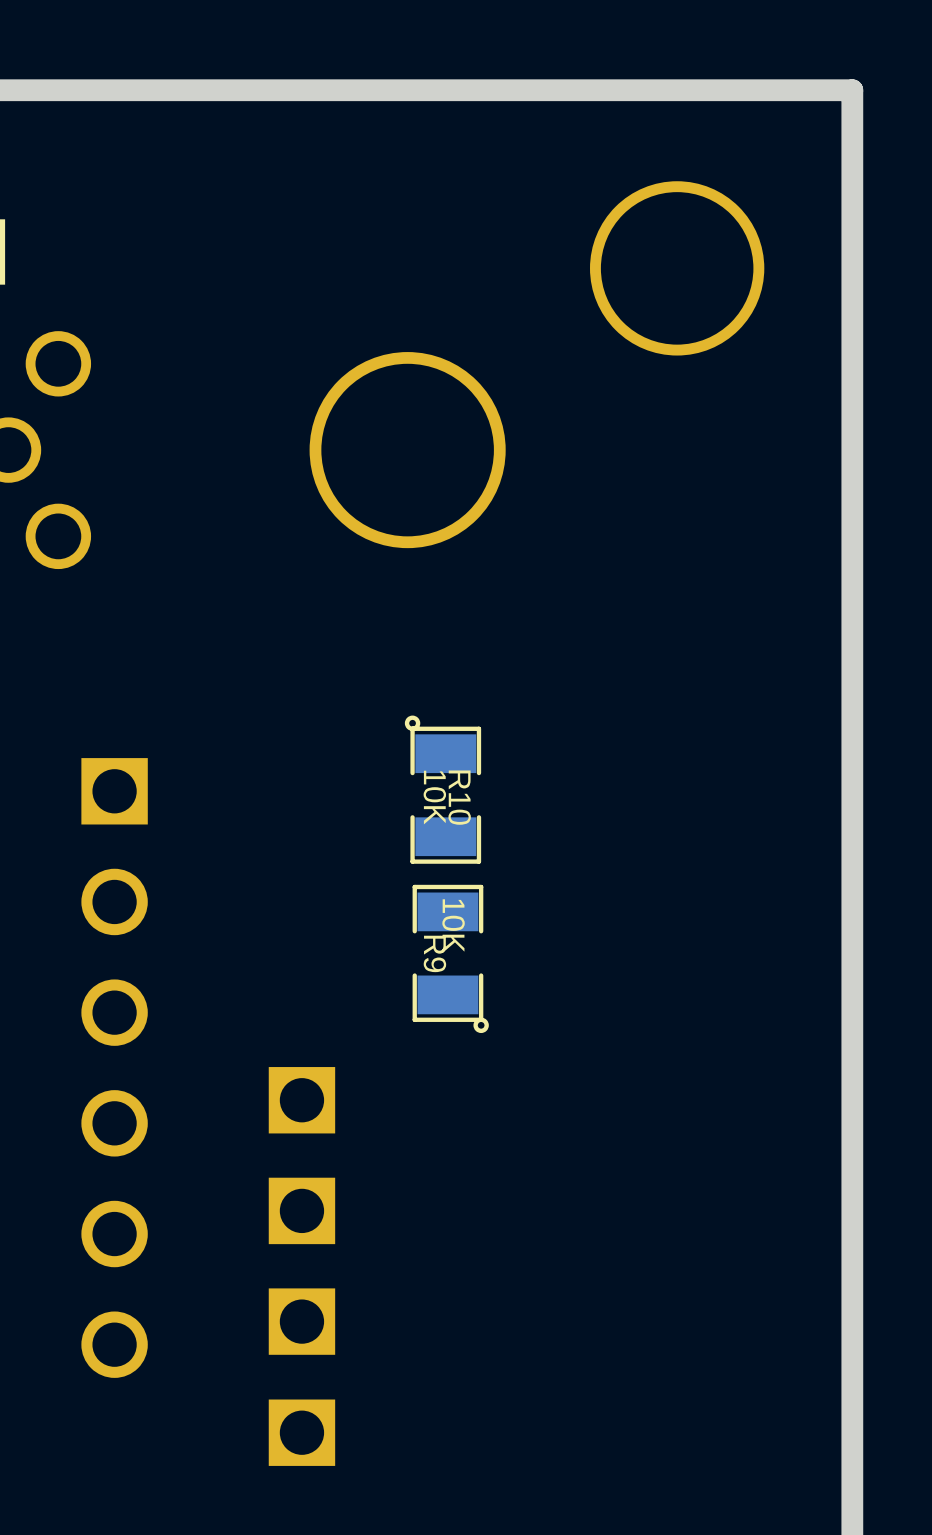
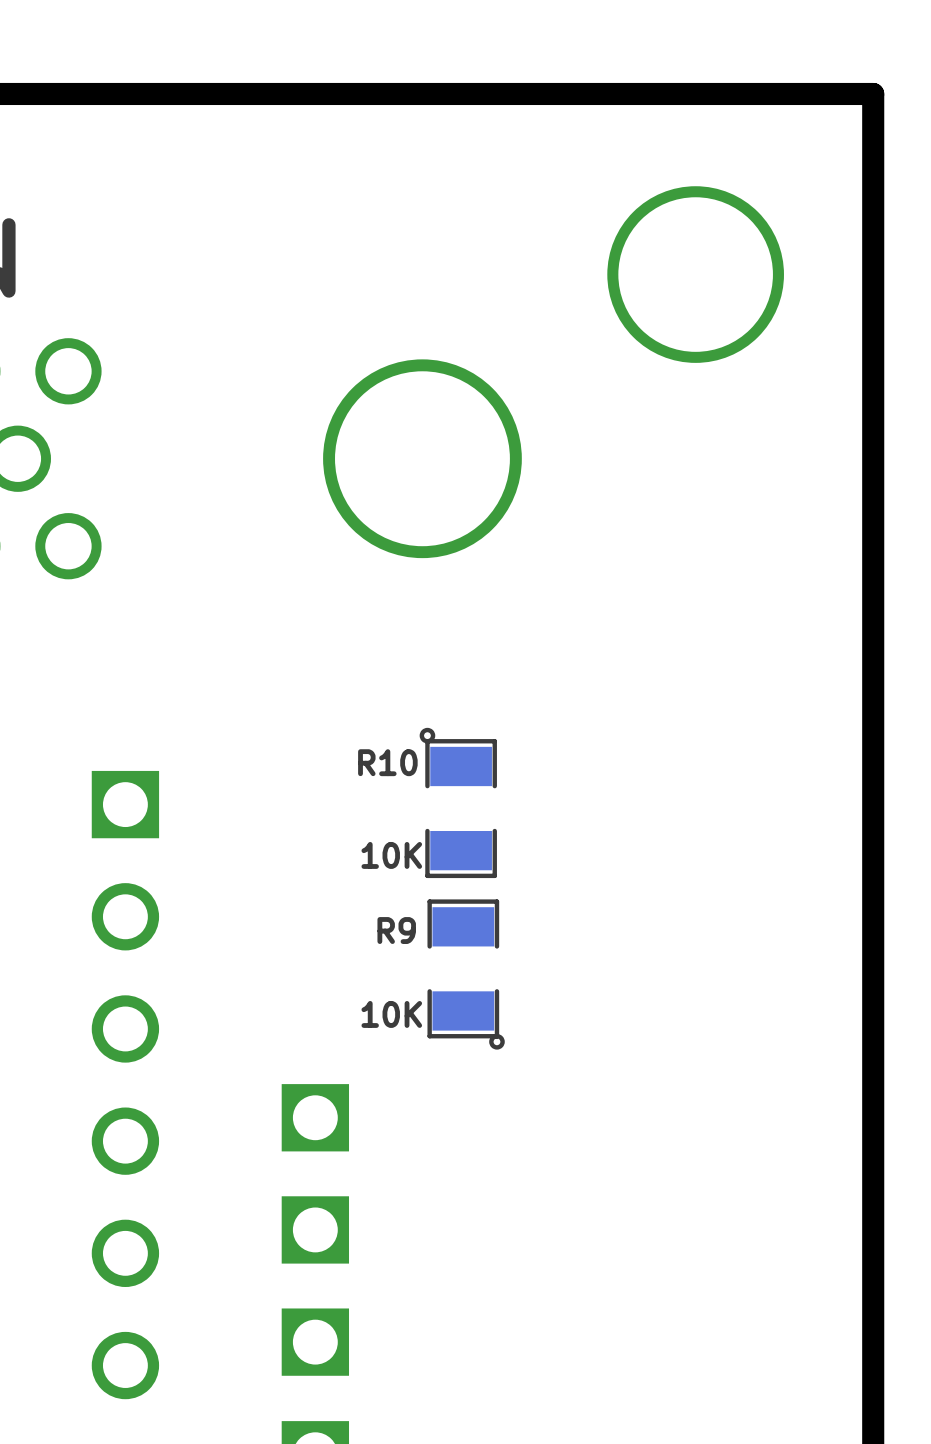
R10 value rotation: 0° (434, 797) -> 90° counterclockwise (391, 855)
R10 name rotation: 0° (459, 797) -> 90° counterclockwise (387, 762)
R10 name position: R10 (459, 797) -> R10 (387, 762)
R9 value rotation: 0° (453, 926) -> 90° counterclockwise (391, 1014)
R9 value position: 10K (453, 926) -> 10K (391, 1014)
R9 name rotation: 0° (434, 953) -> 90° counterclockwise (396, 930)
R9 name position: R9 (434, 953) -> R9 (396, 930)

